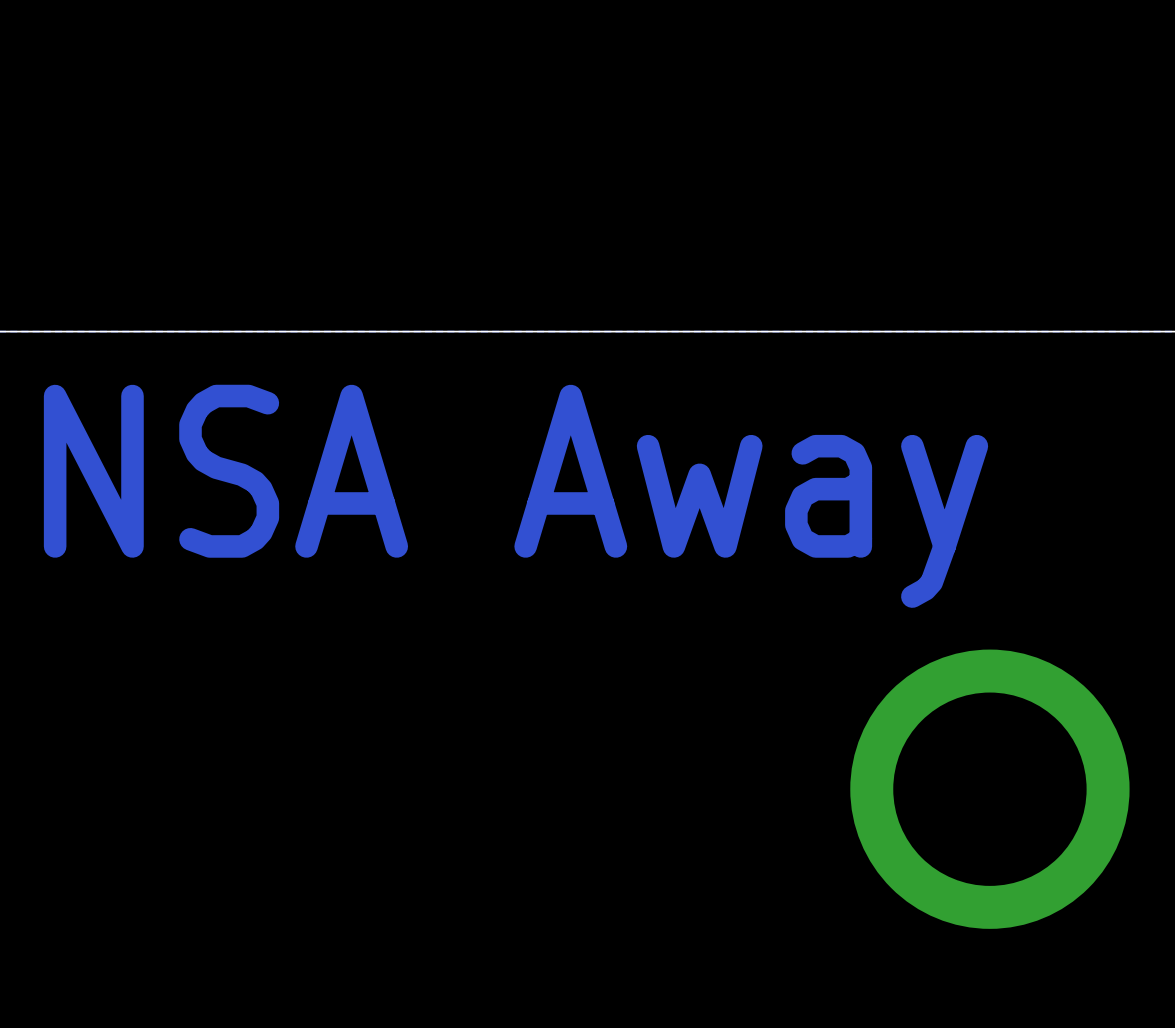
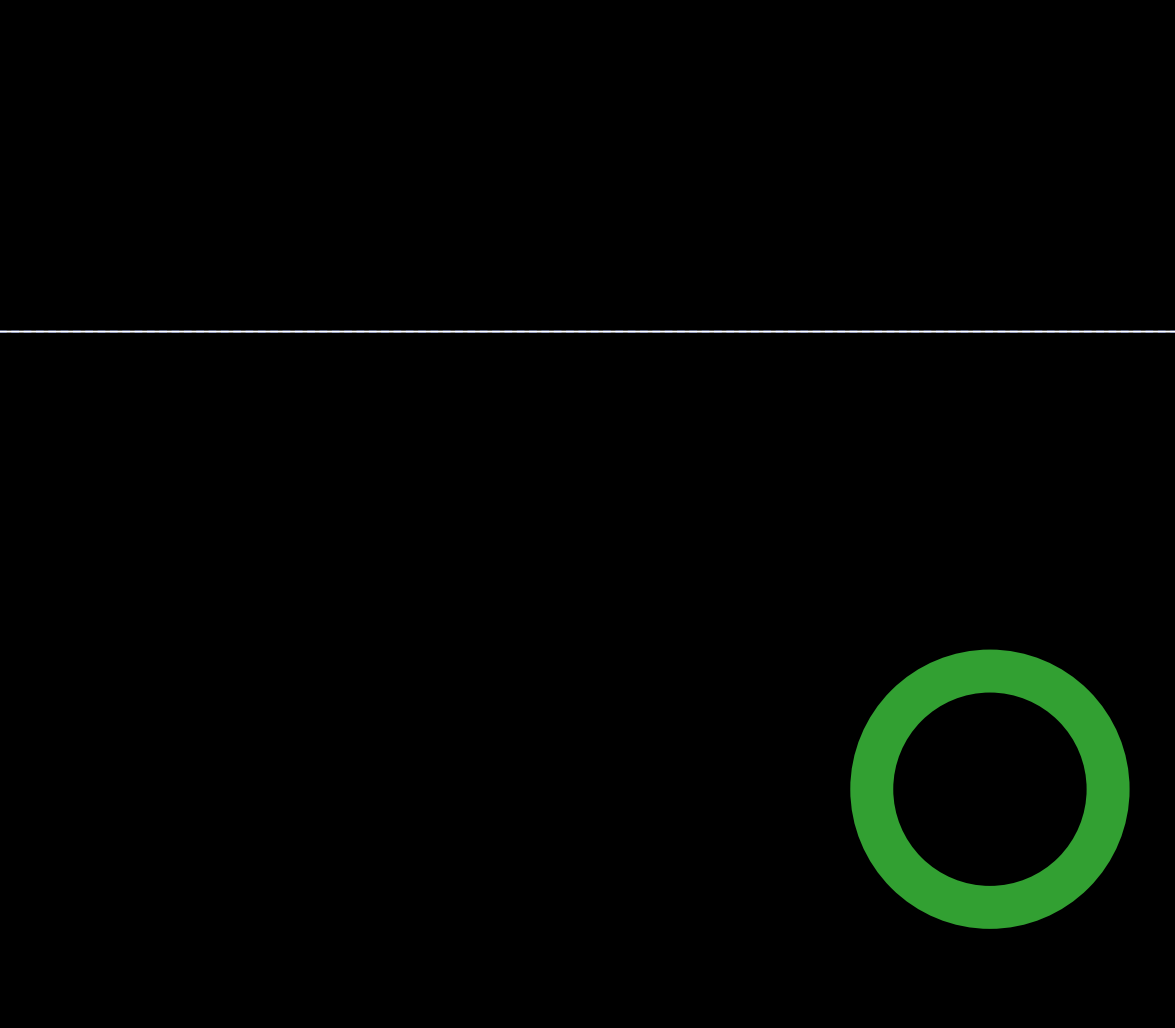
text: NSA Away (515, 496) -> none

